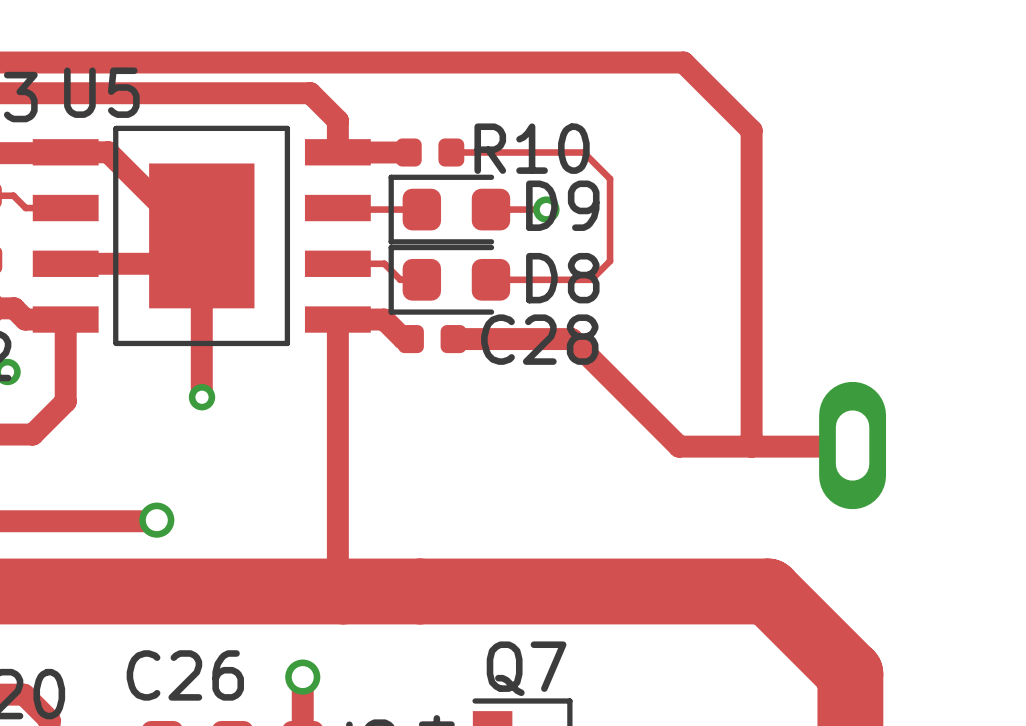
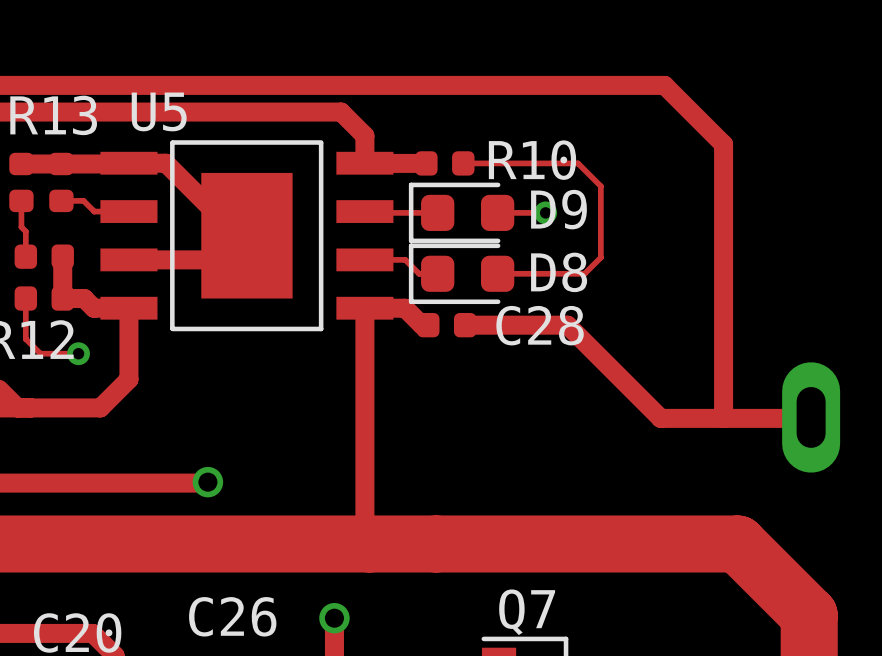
track: (201, 235) (201, 397) -> none
via: (202, 397) -> none

